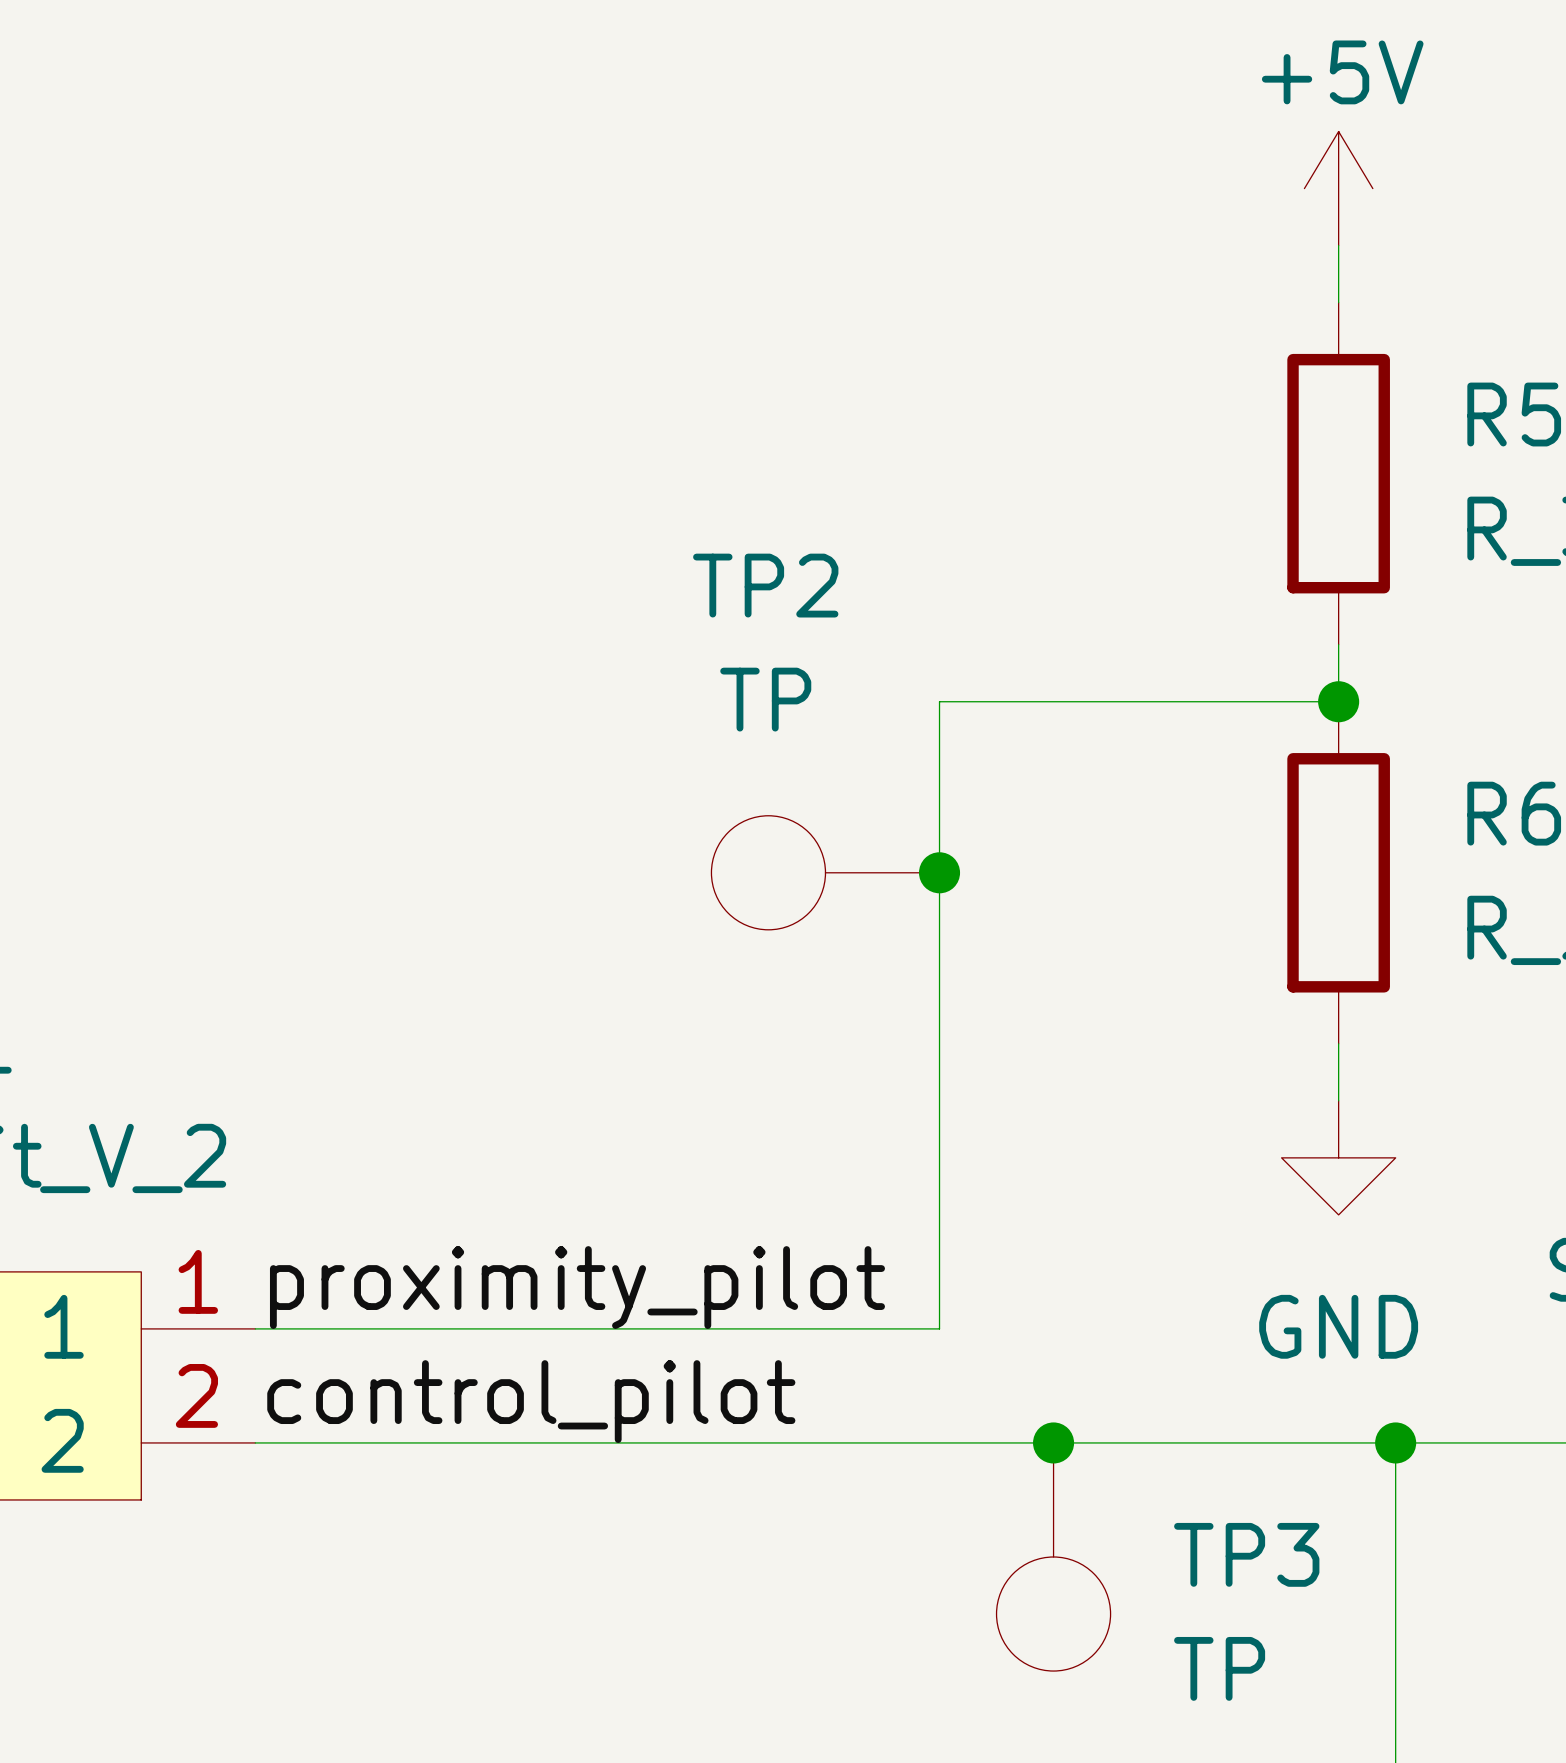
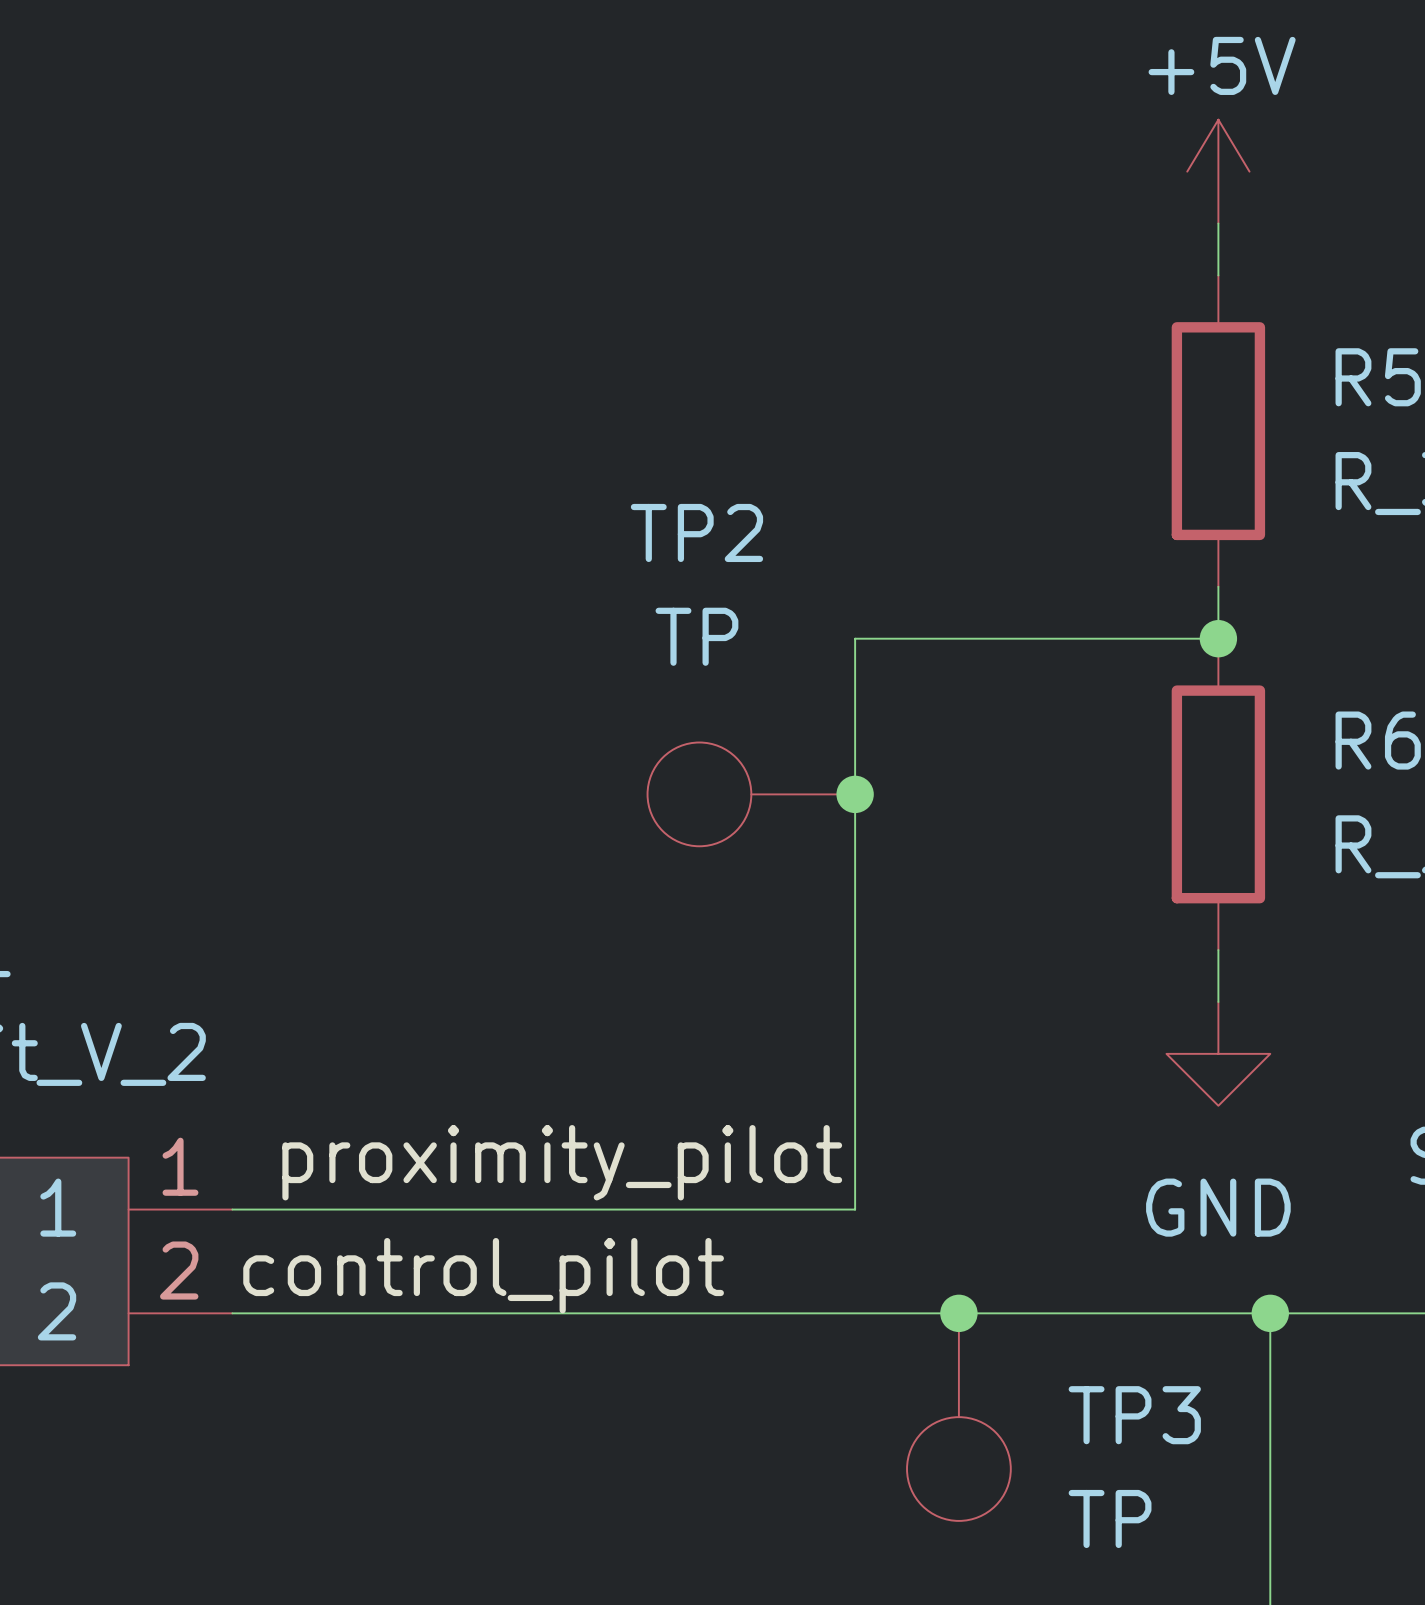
label position: proximity_pilot (577, 1287) -> proximity_pilot (562, 1162)

